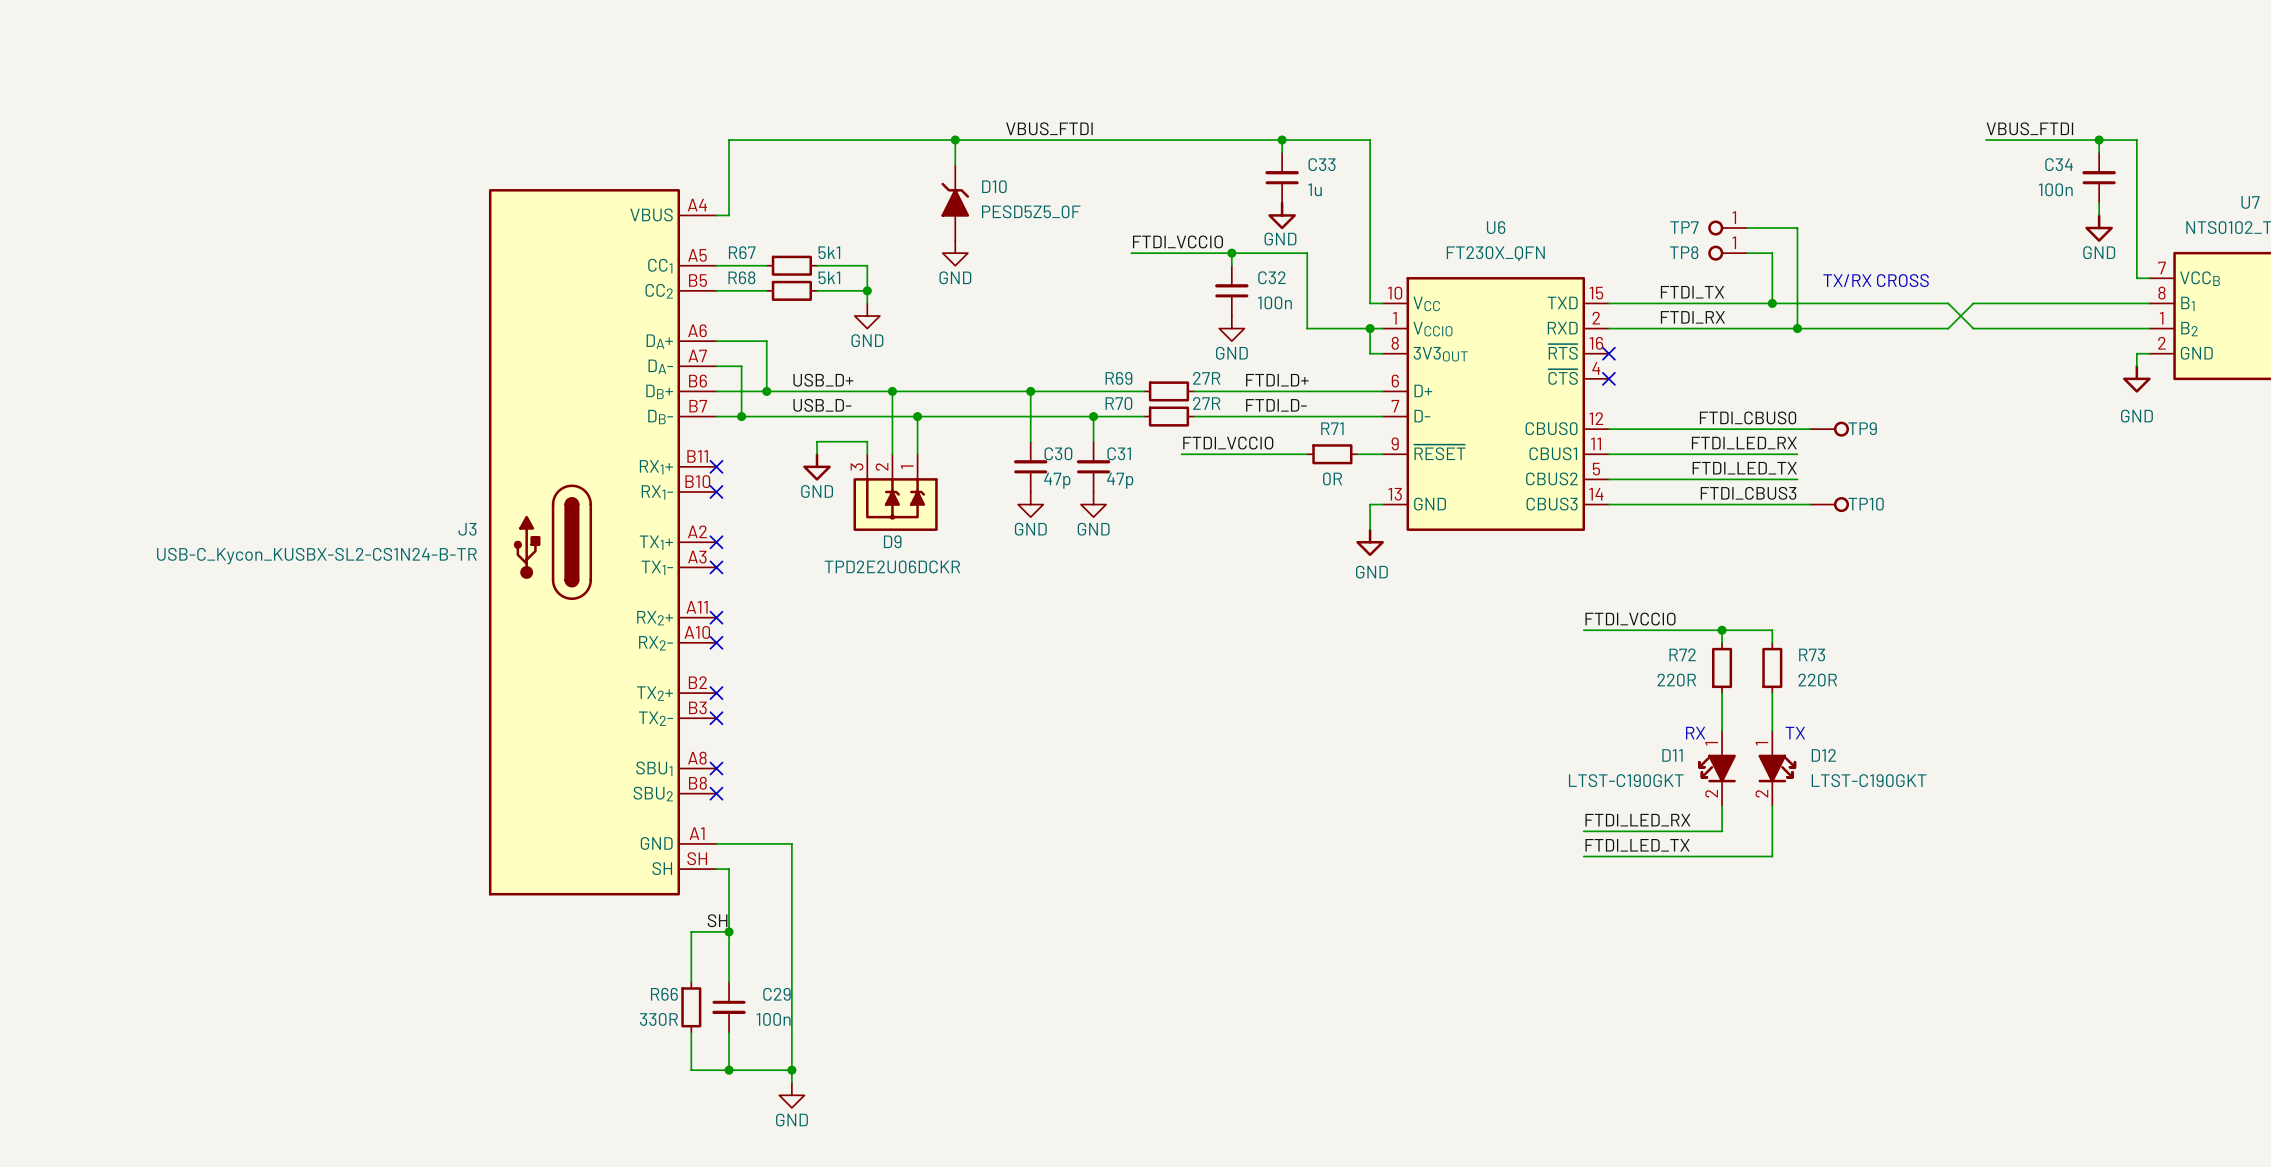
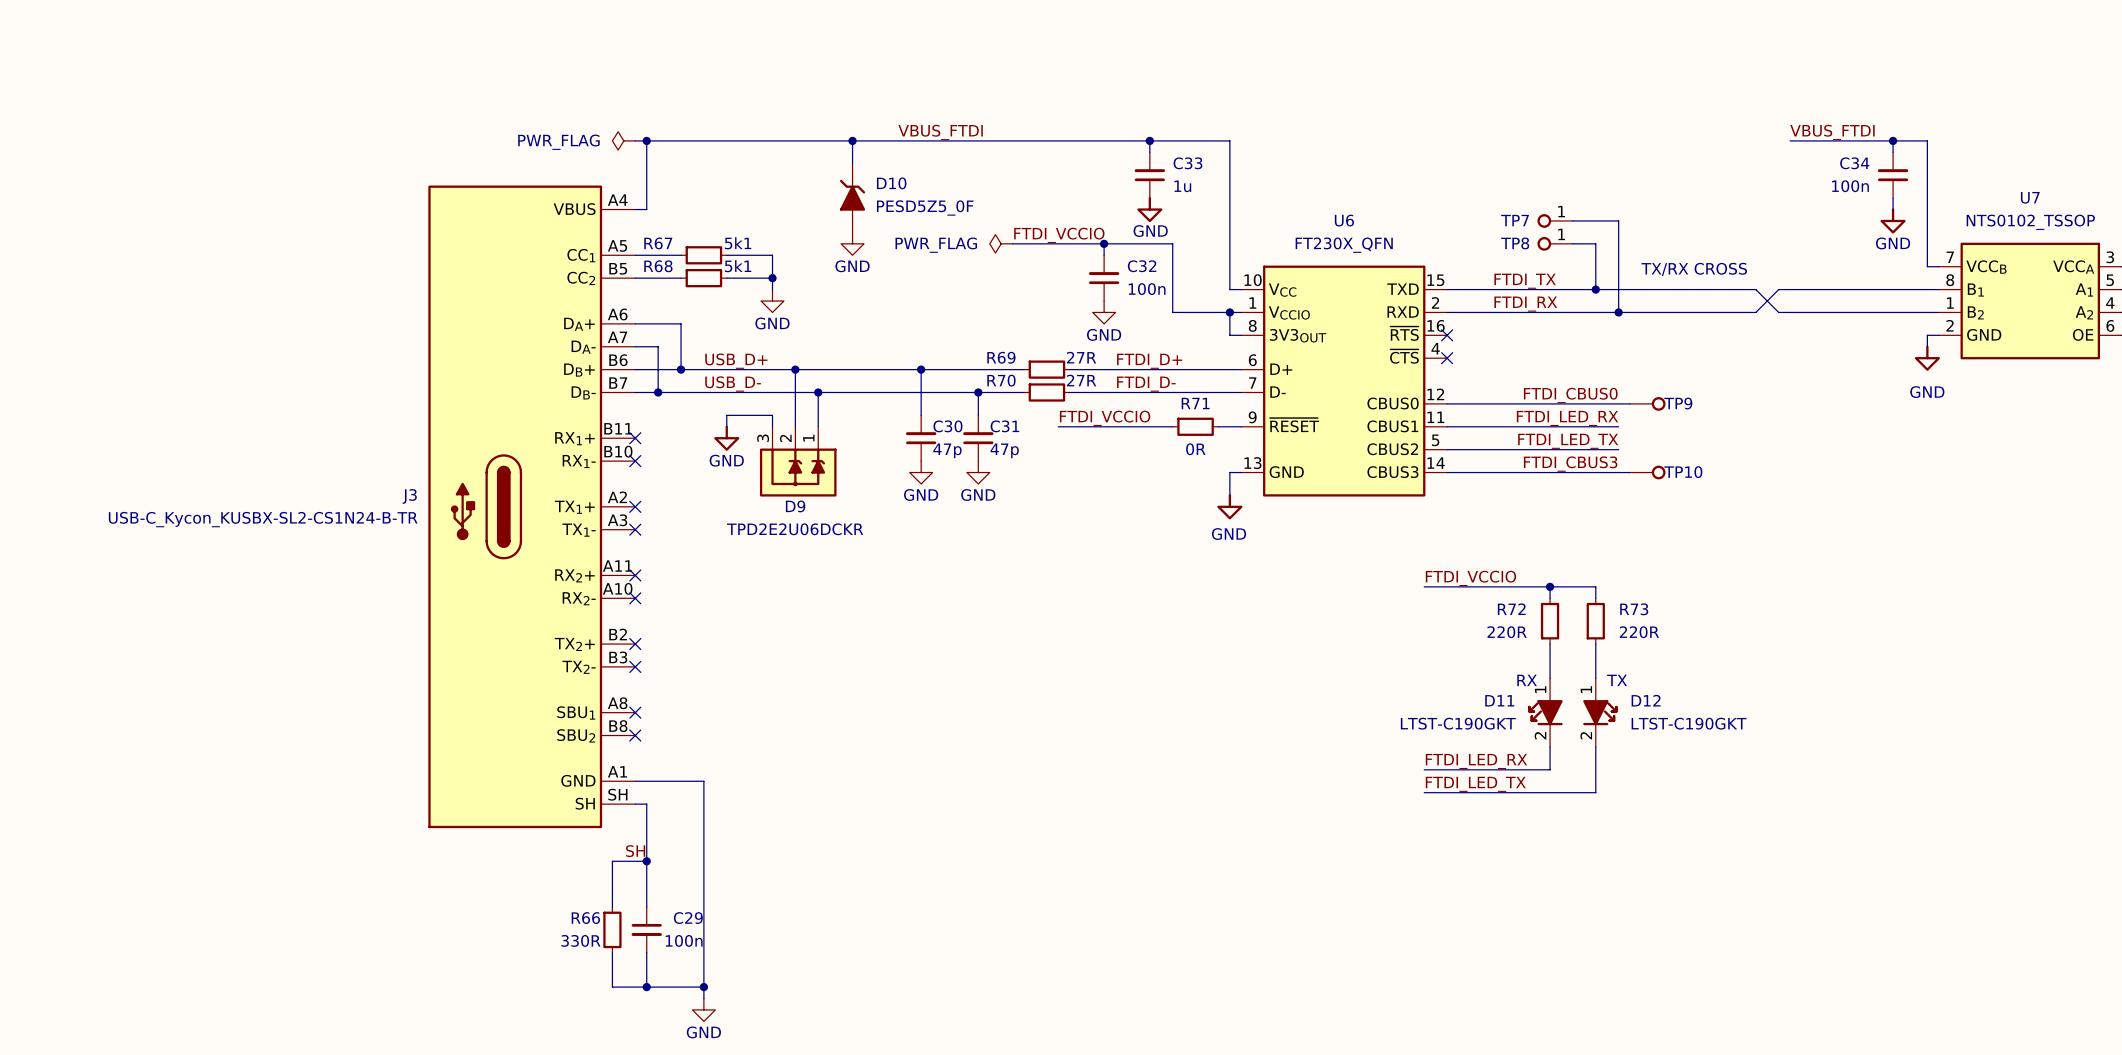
power symbol: none -> PWR_FLAG (623, 140)
wire: none -> (635, 140) (646, 140)
junction: none -> (646, 140)
power symbol: none -> PWR_FLAG (1001, 243)

